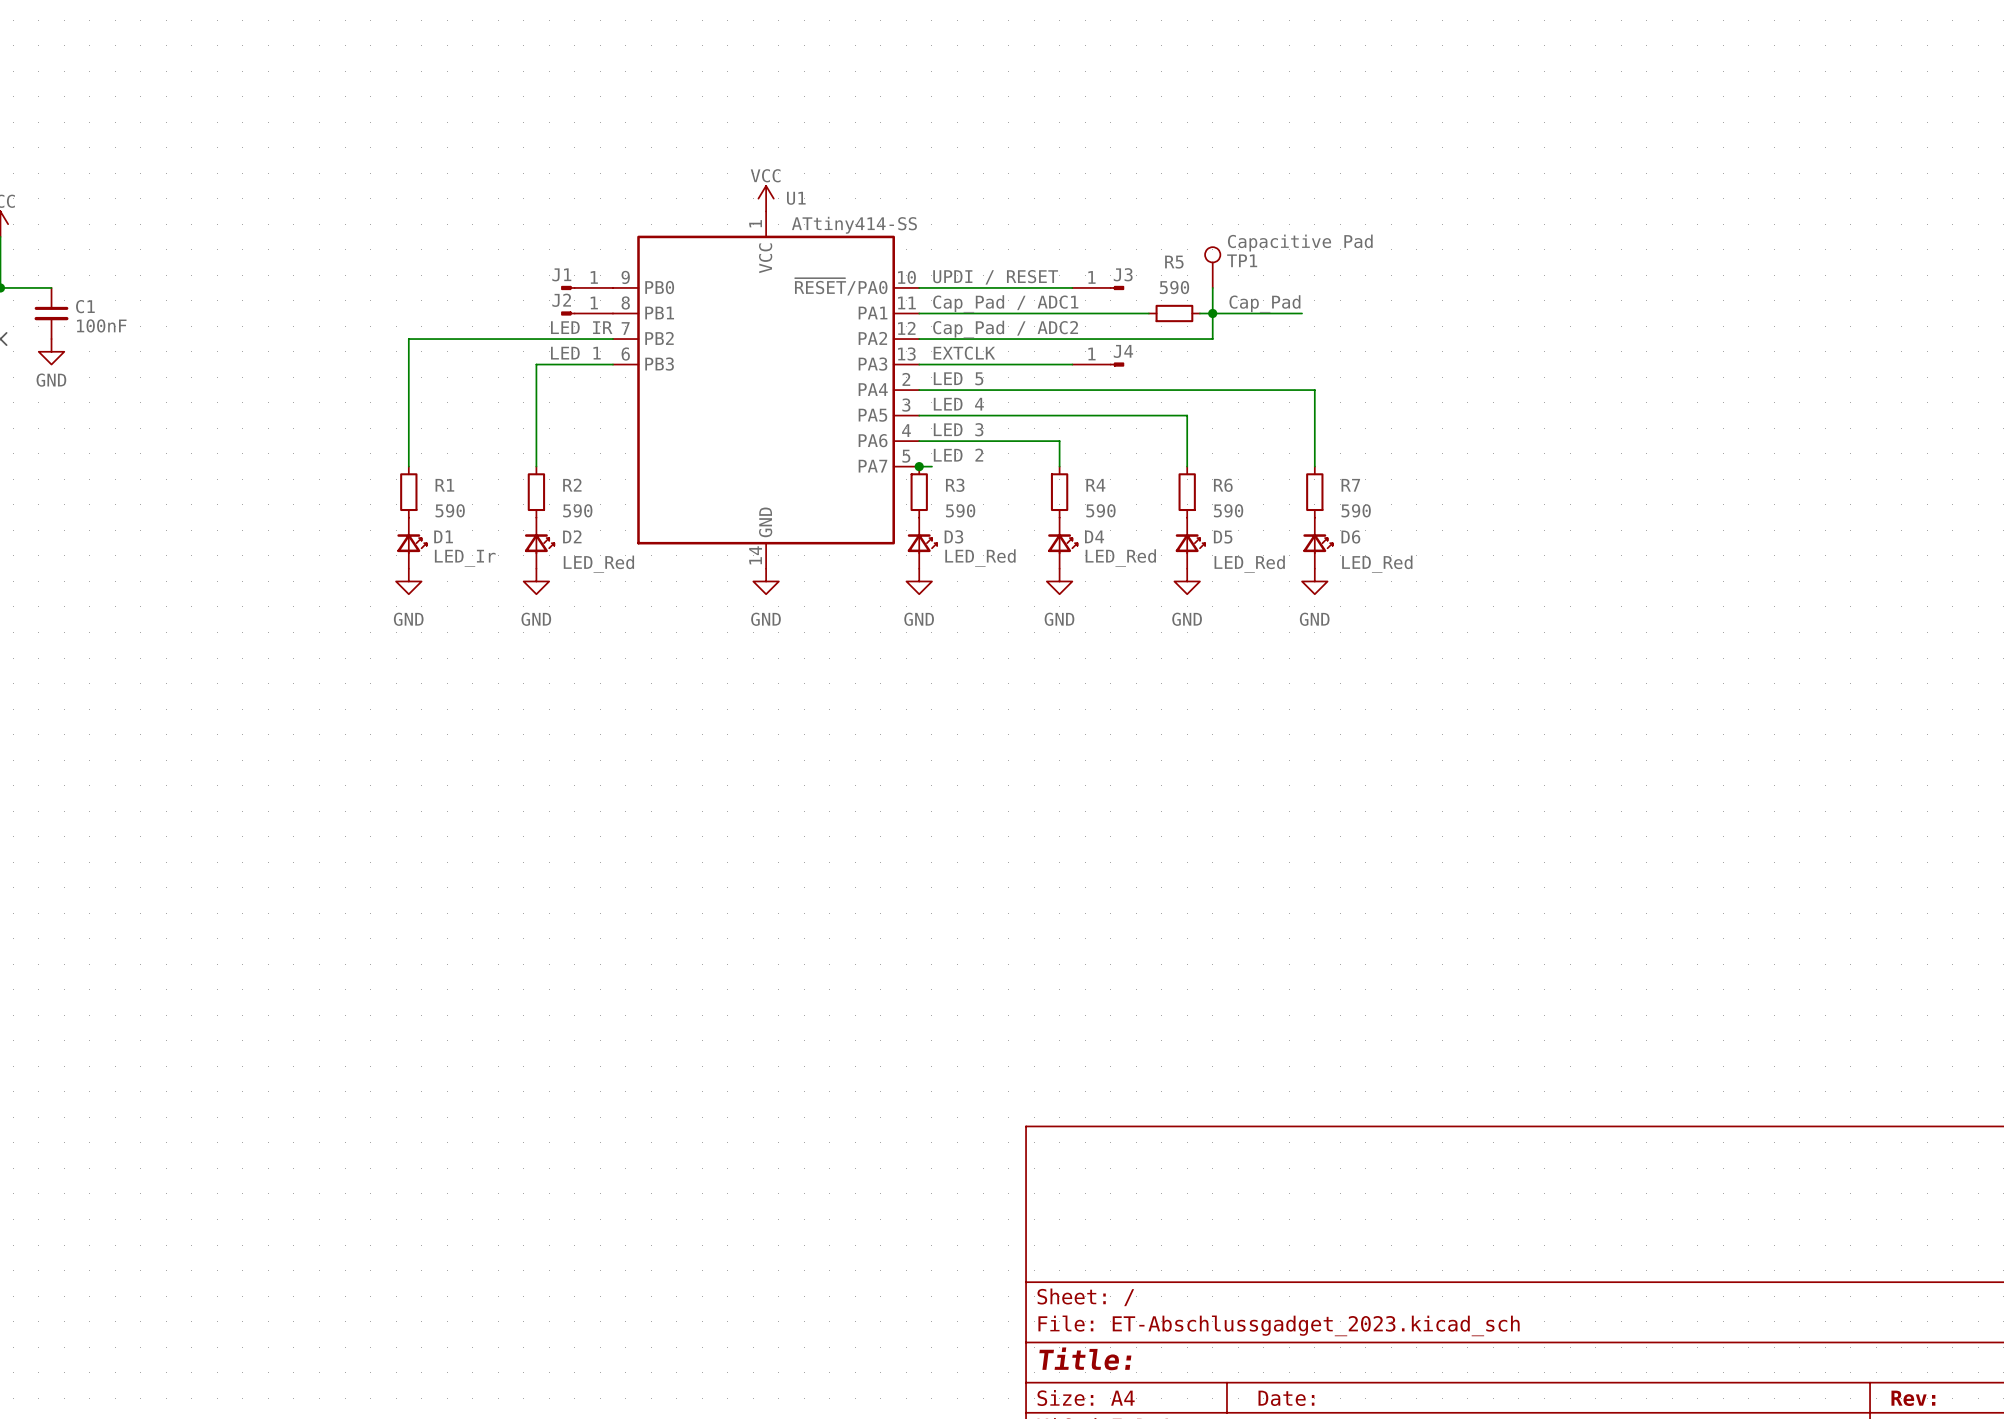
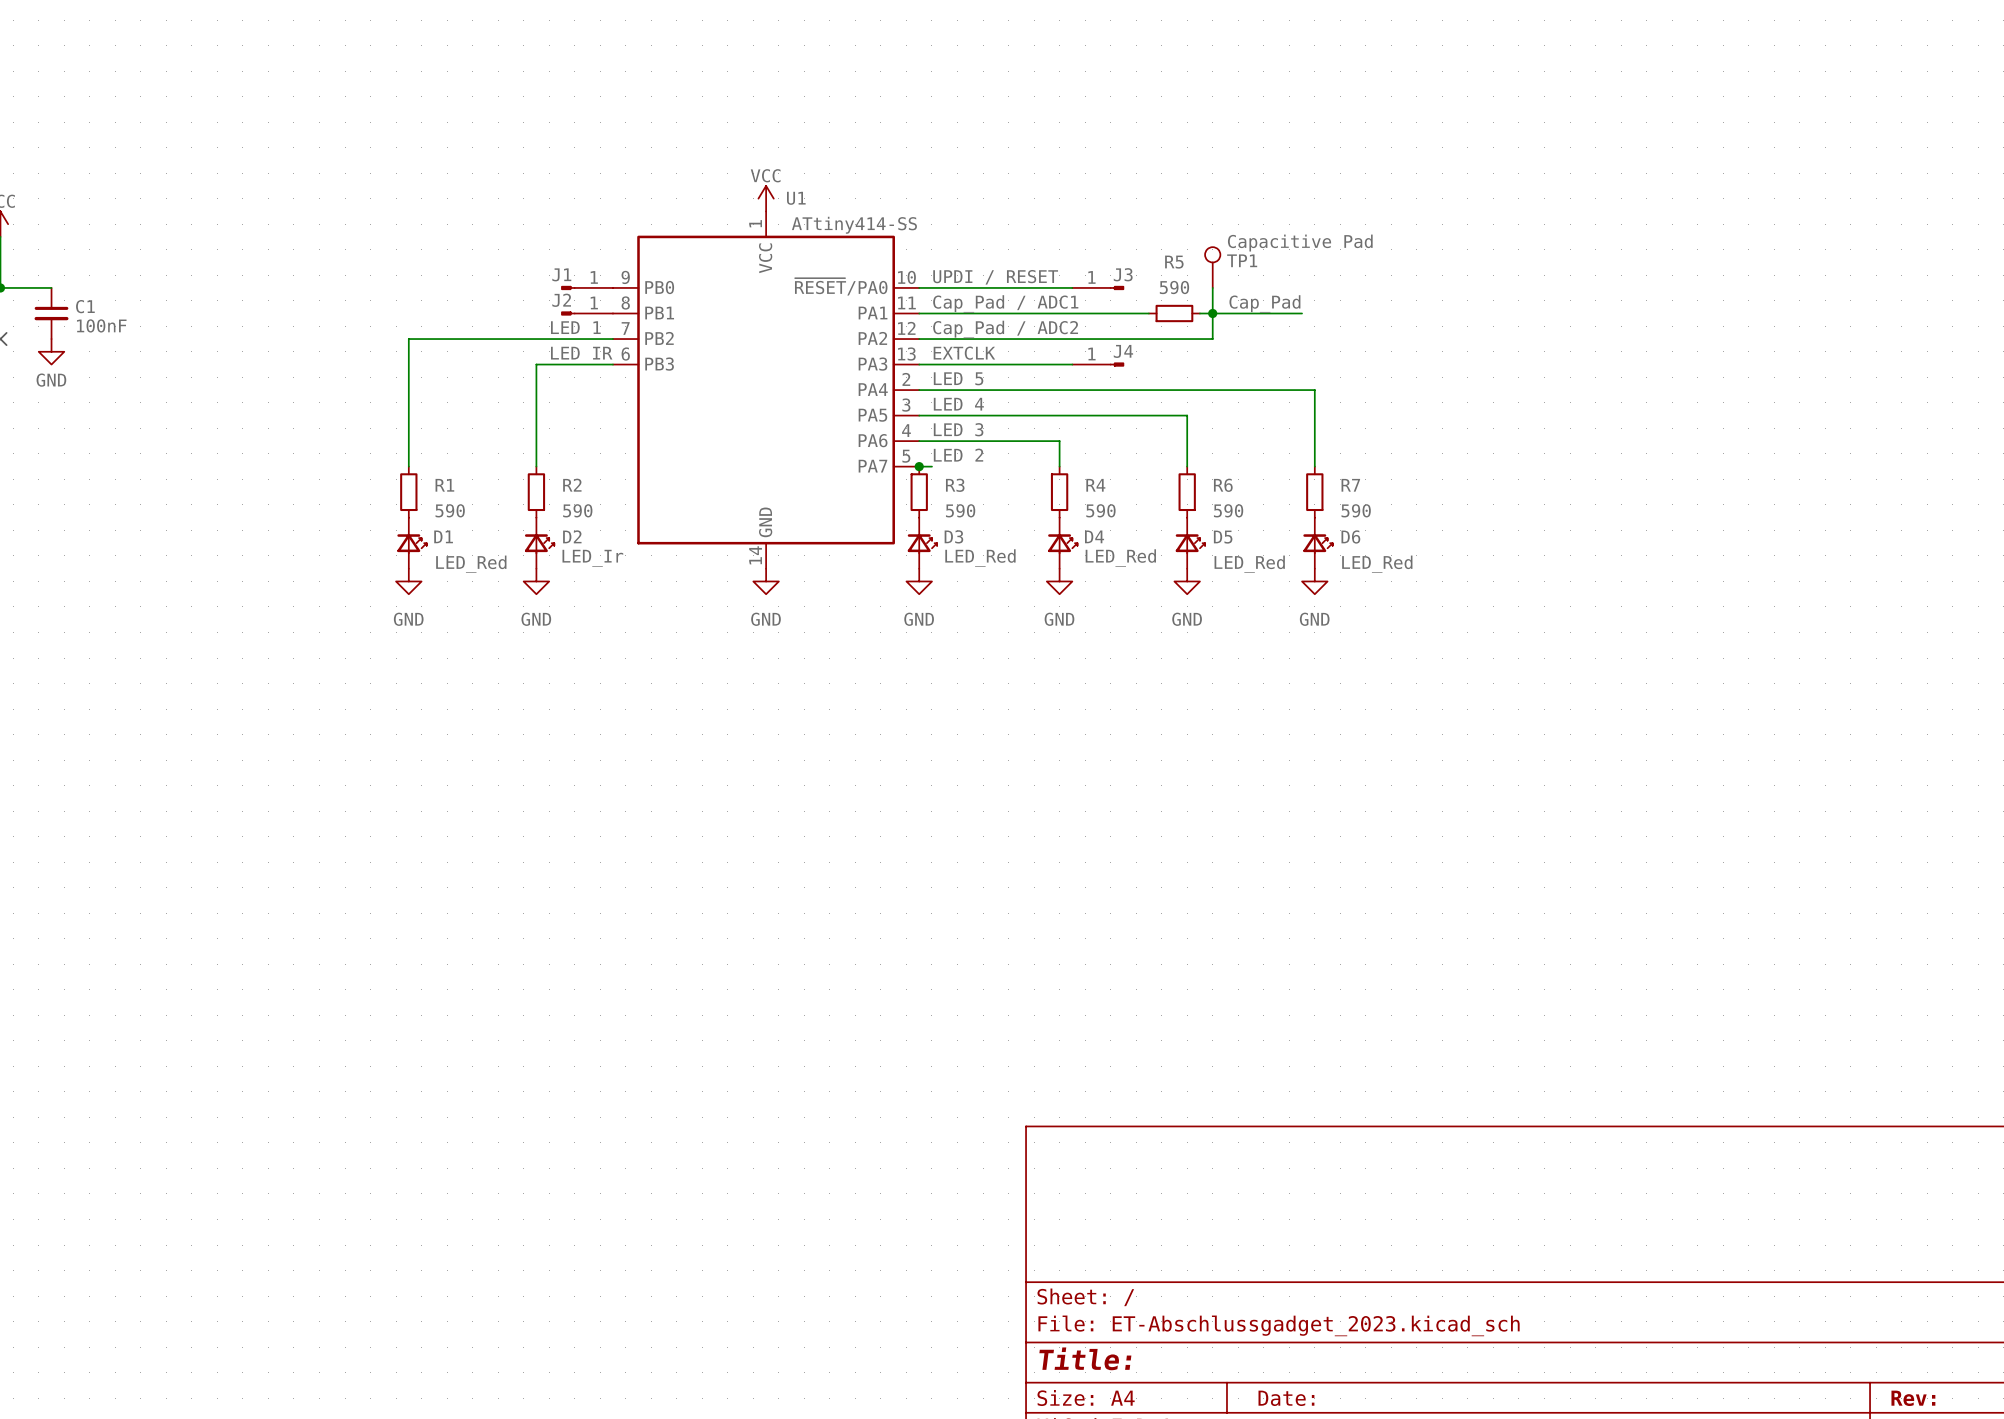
label: LED IR (581, 327) -> LED 1 (575, 327)
label: LED 1 (575, 353) -> LED IR (581, 353)
D1 value: LED_Ir (465, 558) -> LED_Red (471, 564)
D2 value: LED_Red (598, 564) -> LED_Ir (592, 558)

